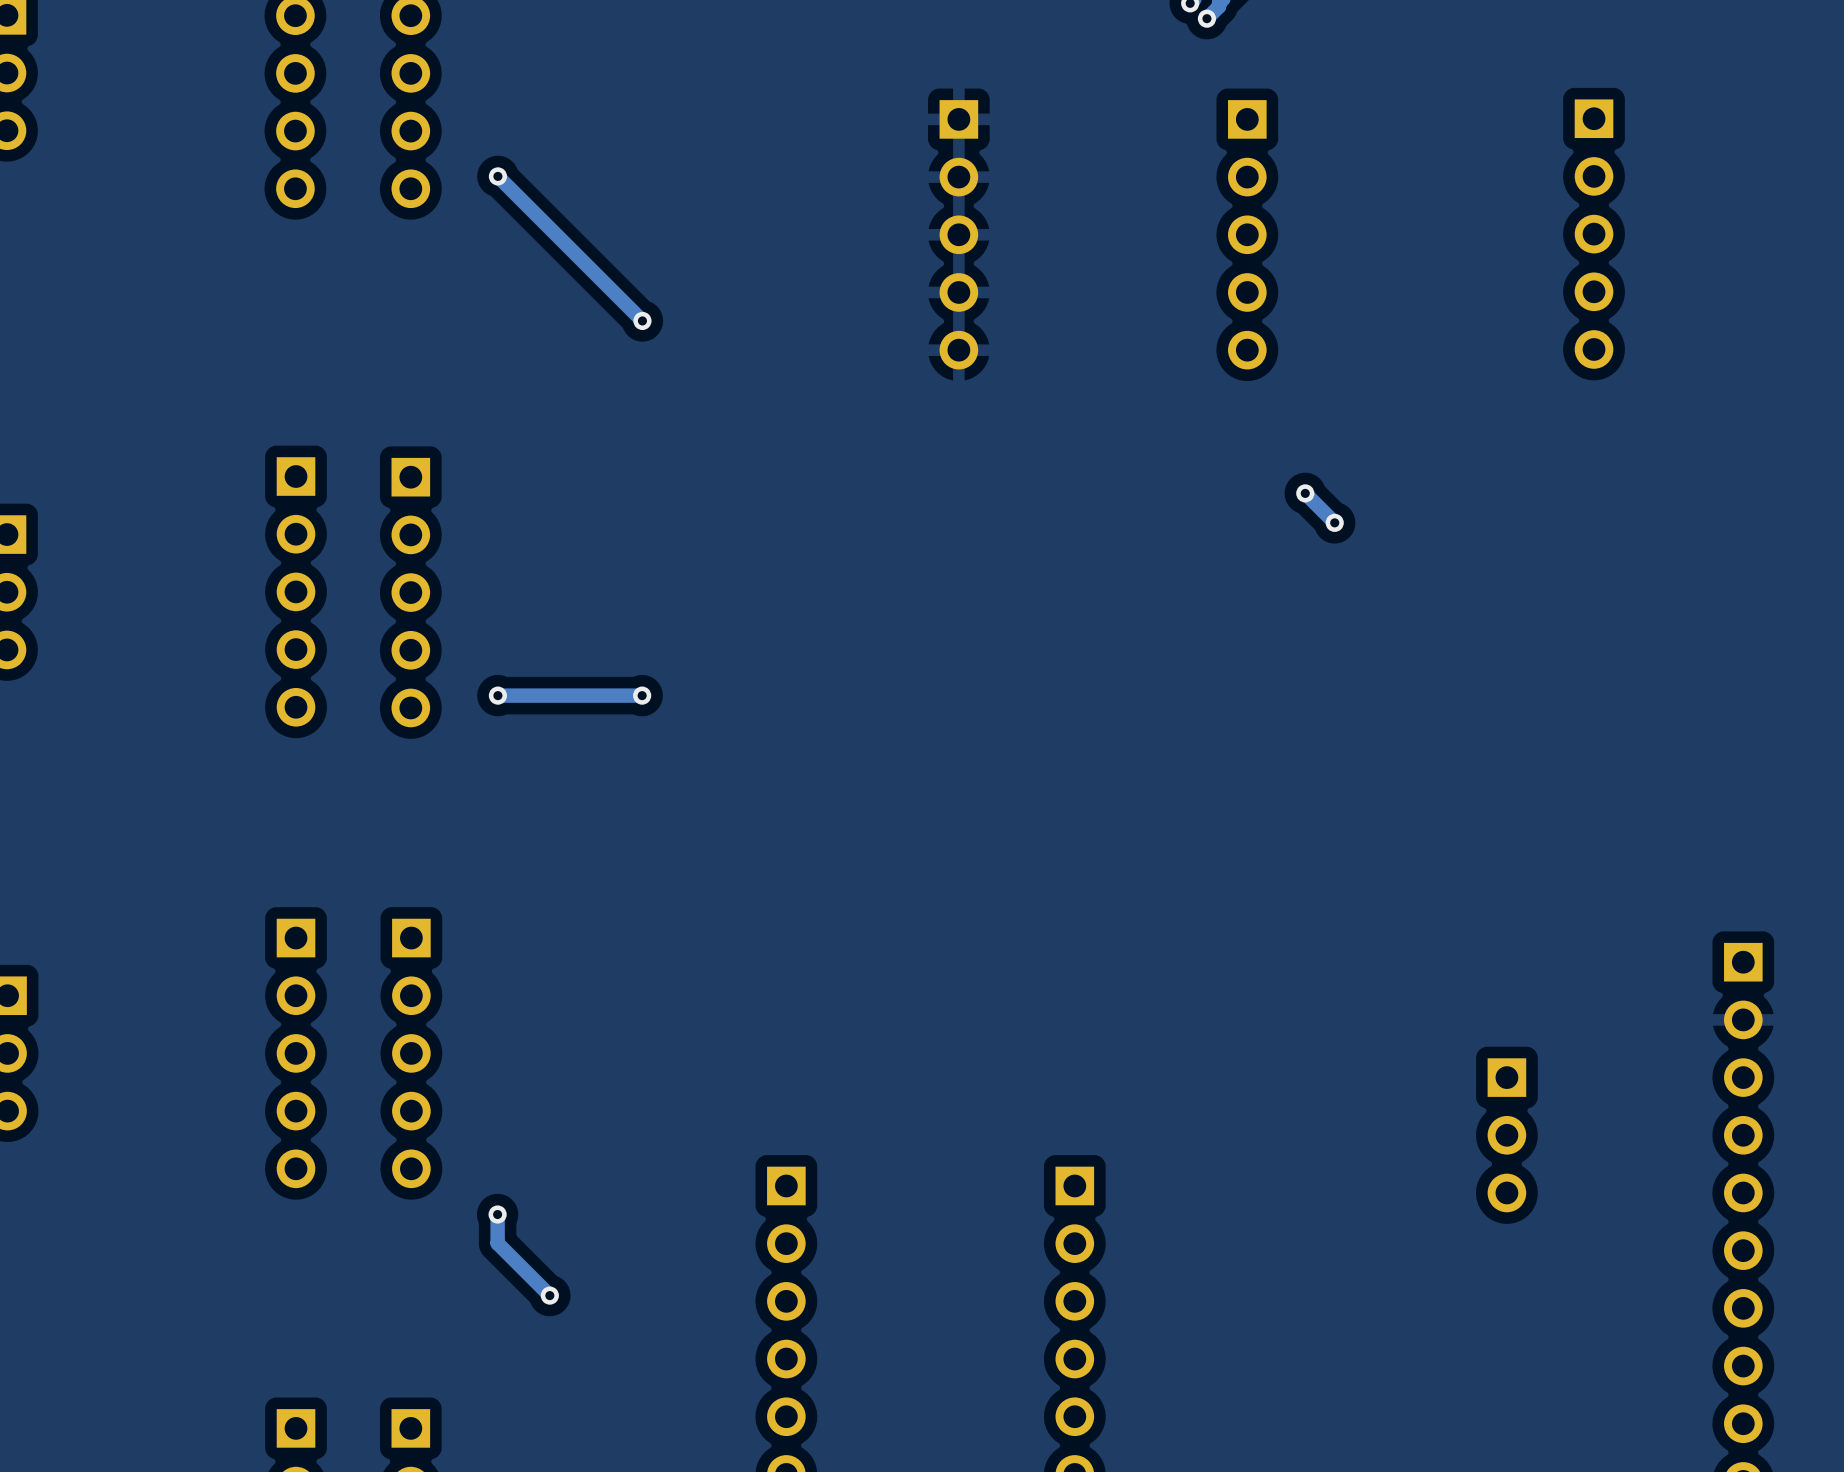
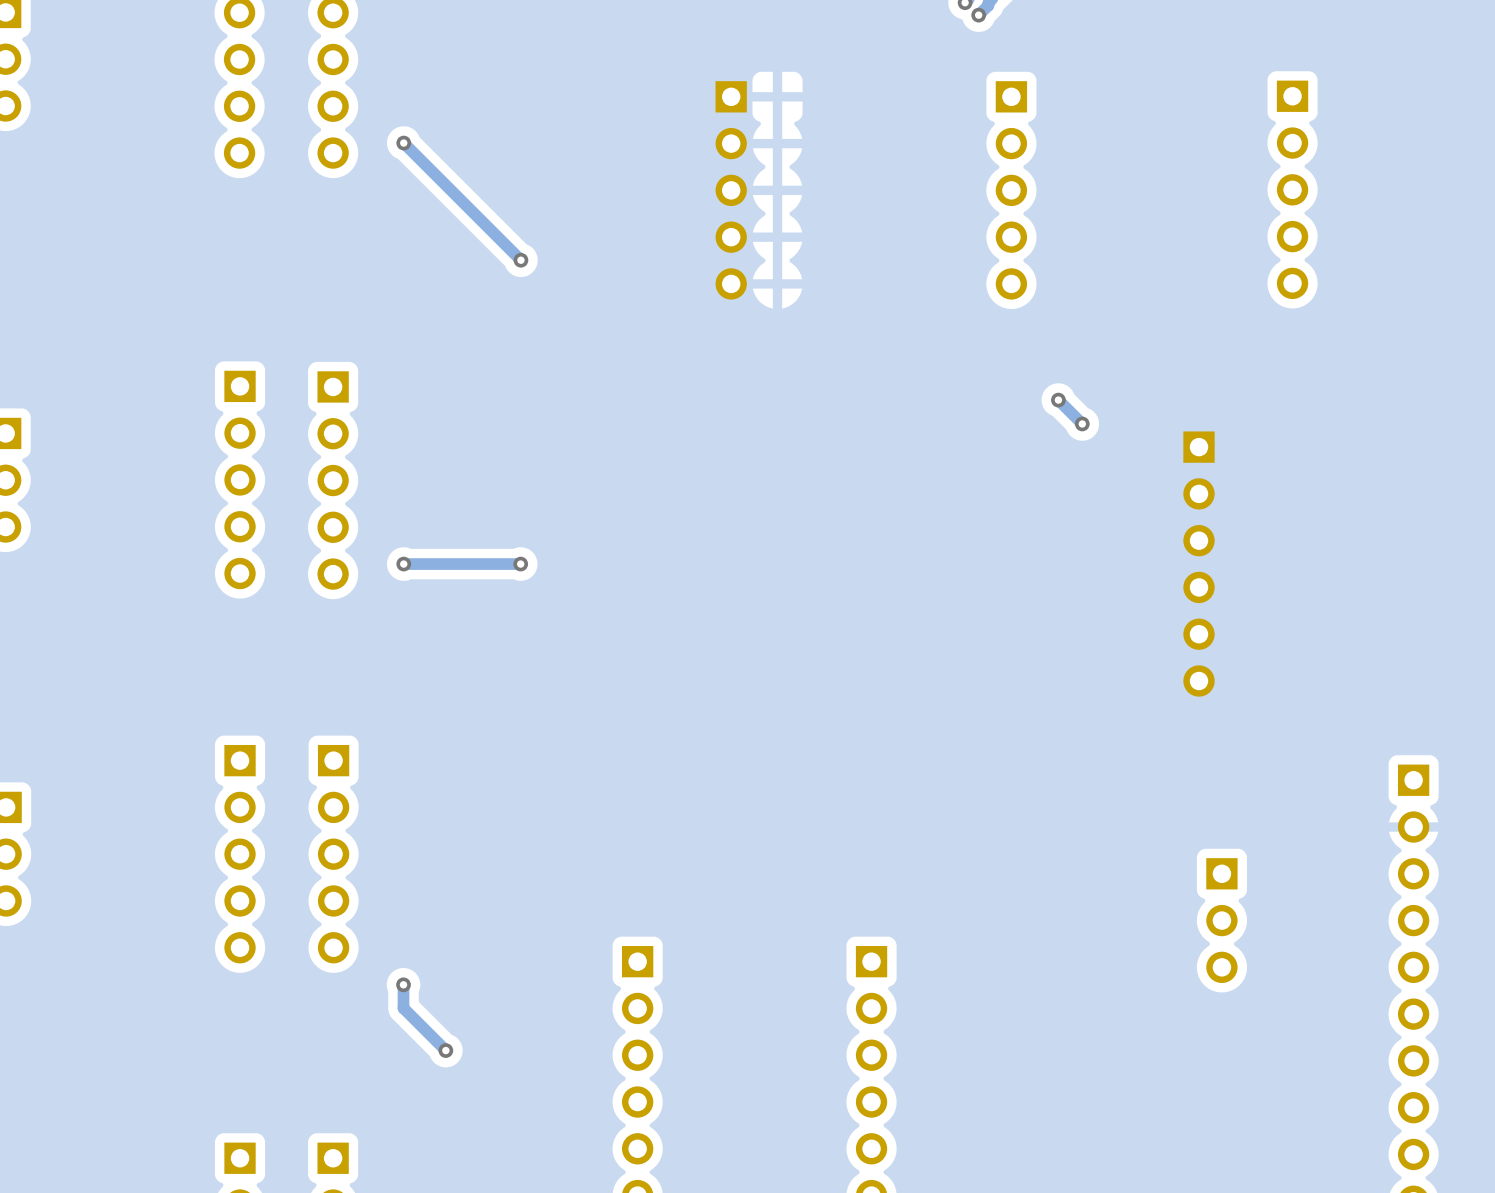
part position: (958, 234) -> (731, 190)
part: none -> (1199, 564)

